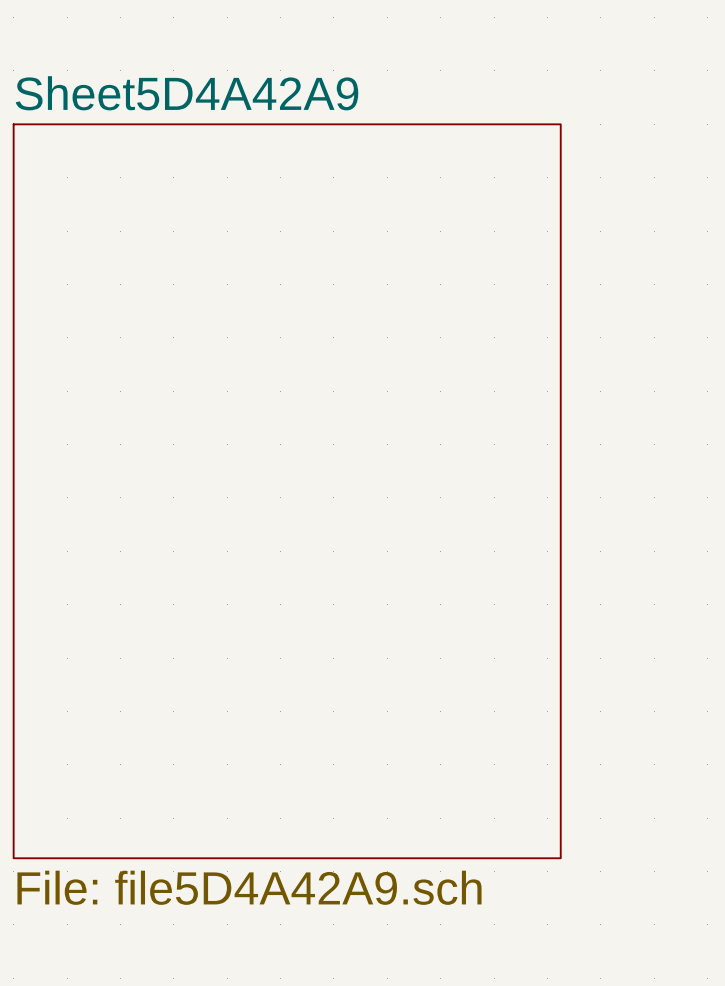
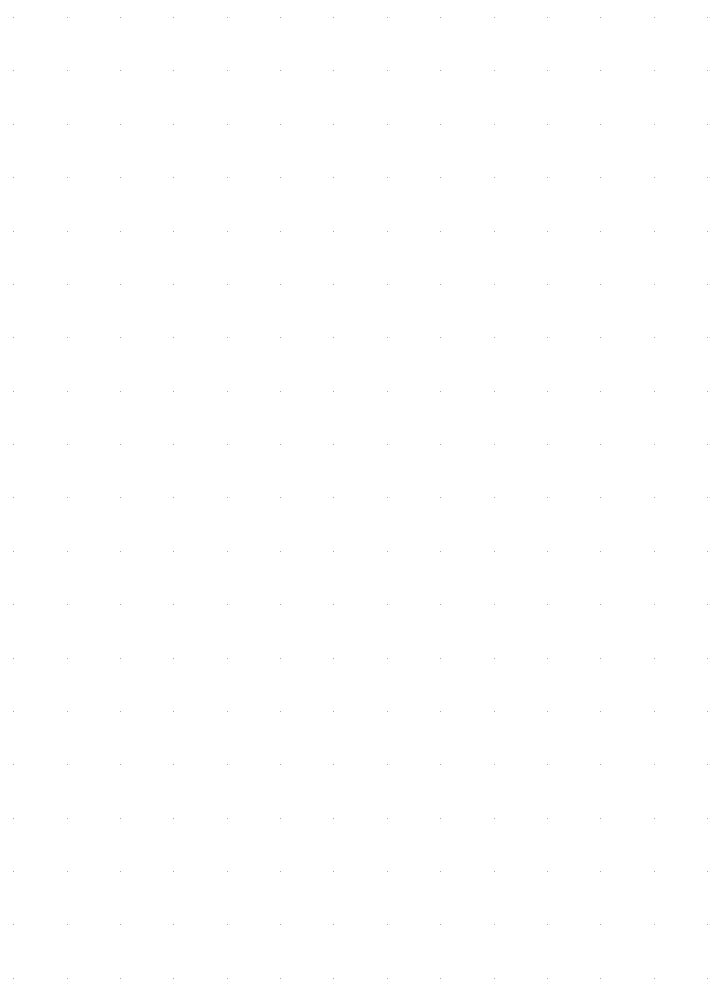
sheet Sheet5D4A42A9: File: file5D4A42A9.sch (287, 491) -> none

